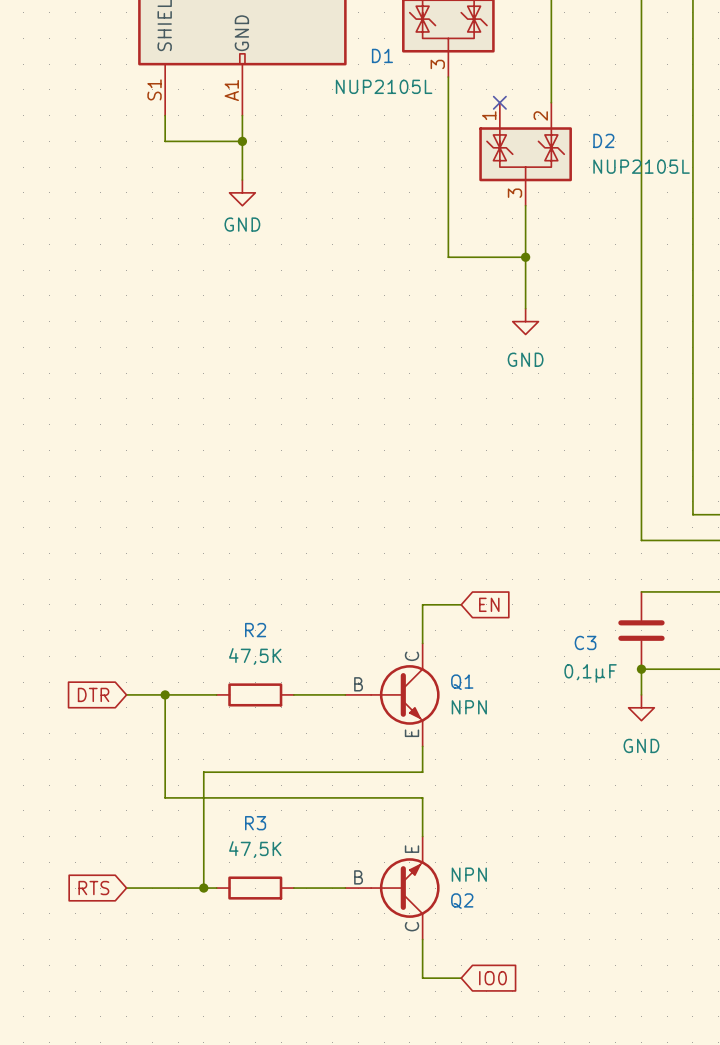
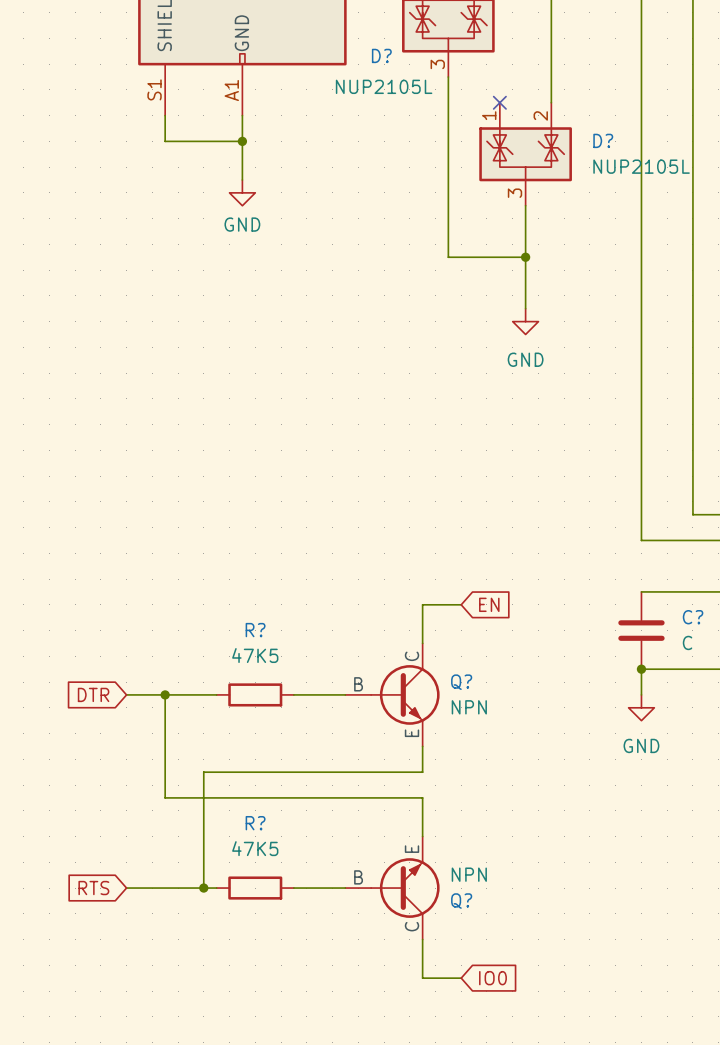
D1 name: D1 (382, 55) -> D? (381, 55)
D2 name: D2 (603, 140) -> D? (603, 140)
R2 name: R2 (255, 630) -> R? (255, 630)
C3 name: C3 (585, 642) -> C? (693, 617)
R2 value: 47,5K (255, 656) -> 47K5 (255, 655)
C3 value: 0,1µF (590, 673) -> C (687, 642)
Q1 name: Q1 (462, 682) -> Q? (461, 682)
R3 name: R3 (255, 823) -> R? (255, 823)
R3 value: 47,5K (255, 849) -> 47K5 (255, 848)
Q2 name: Q2 (462, 901) -> Q? (461, 901)

